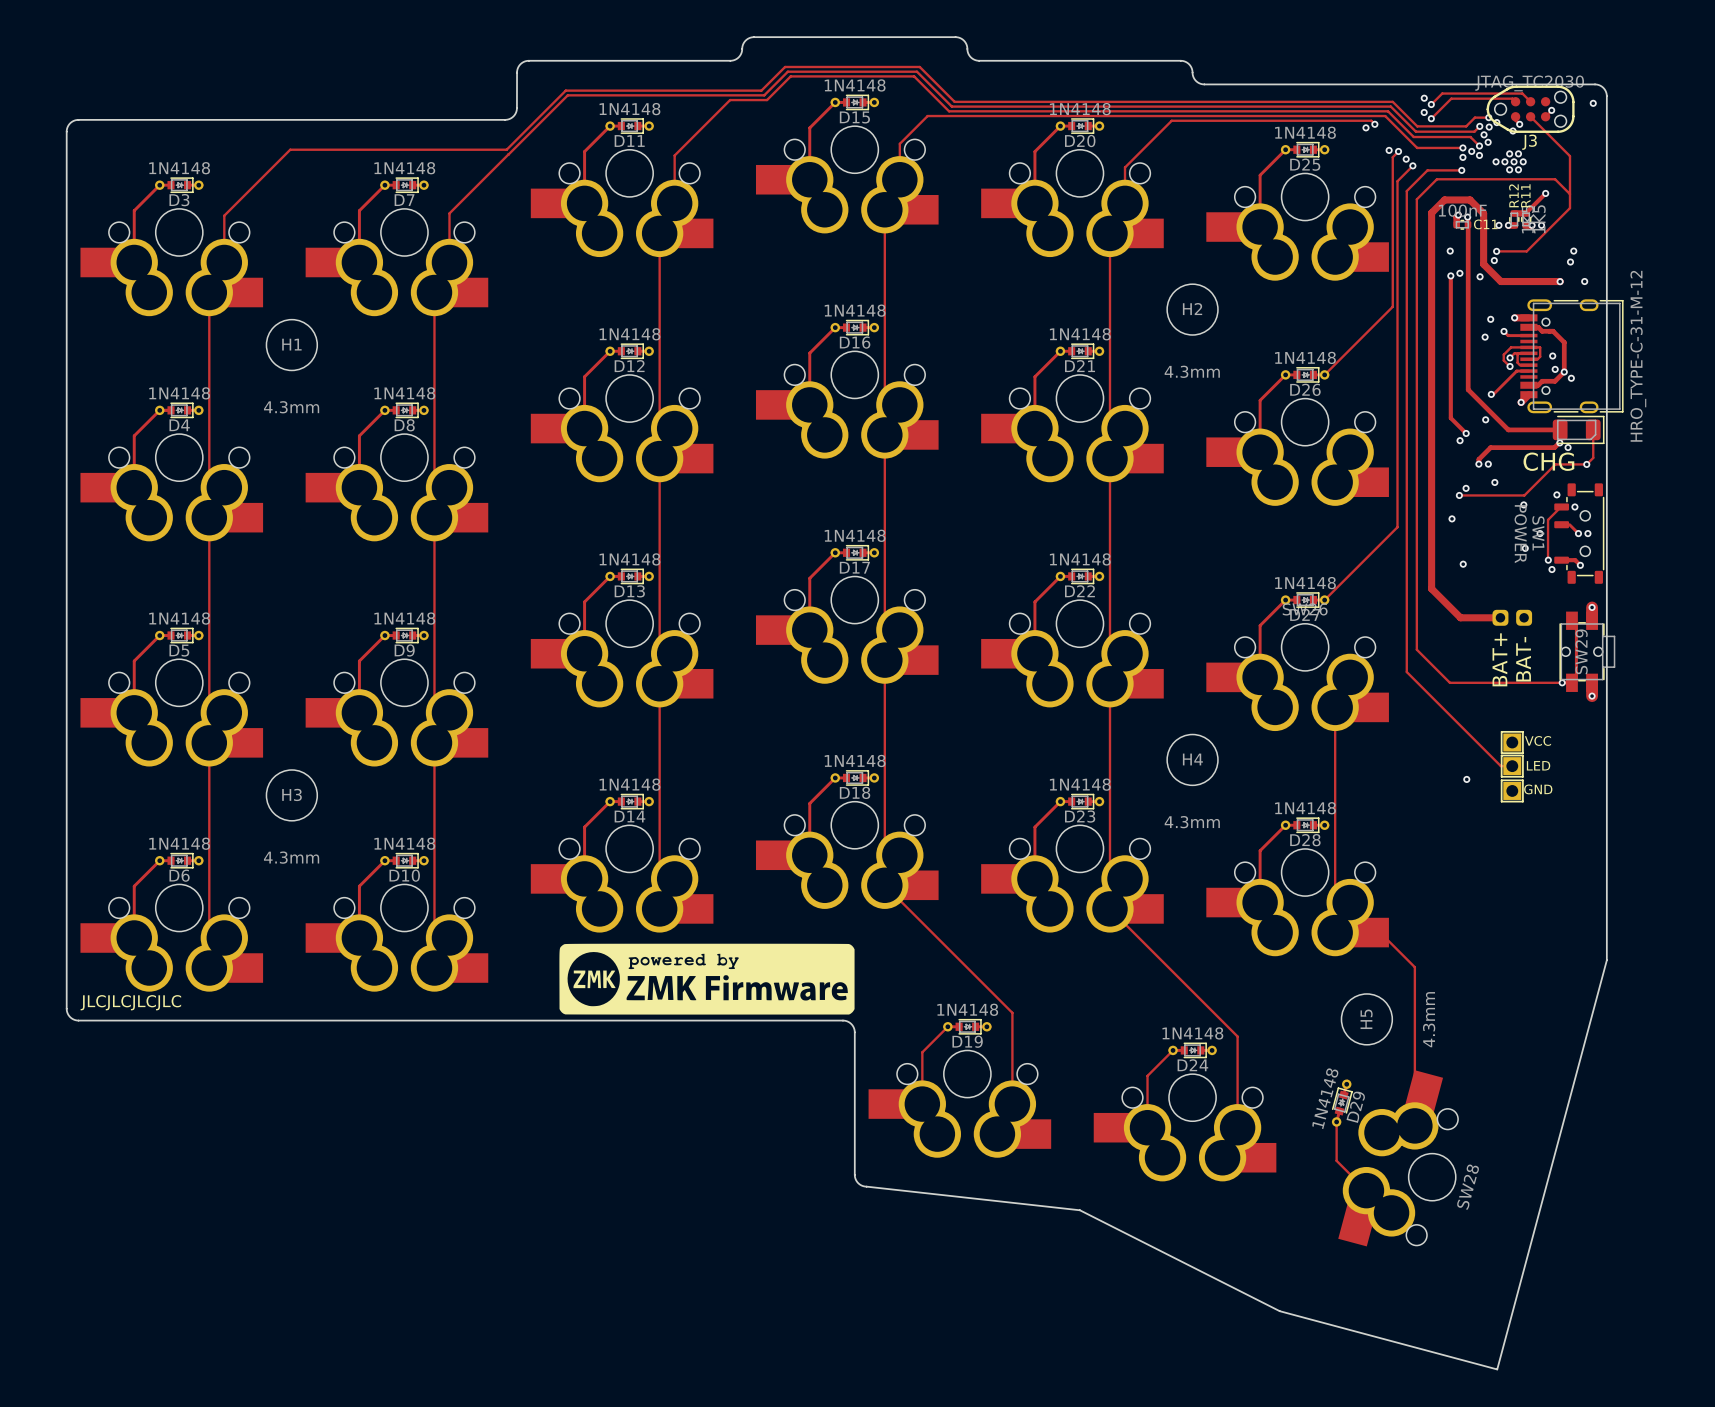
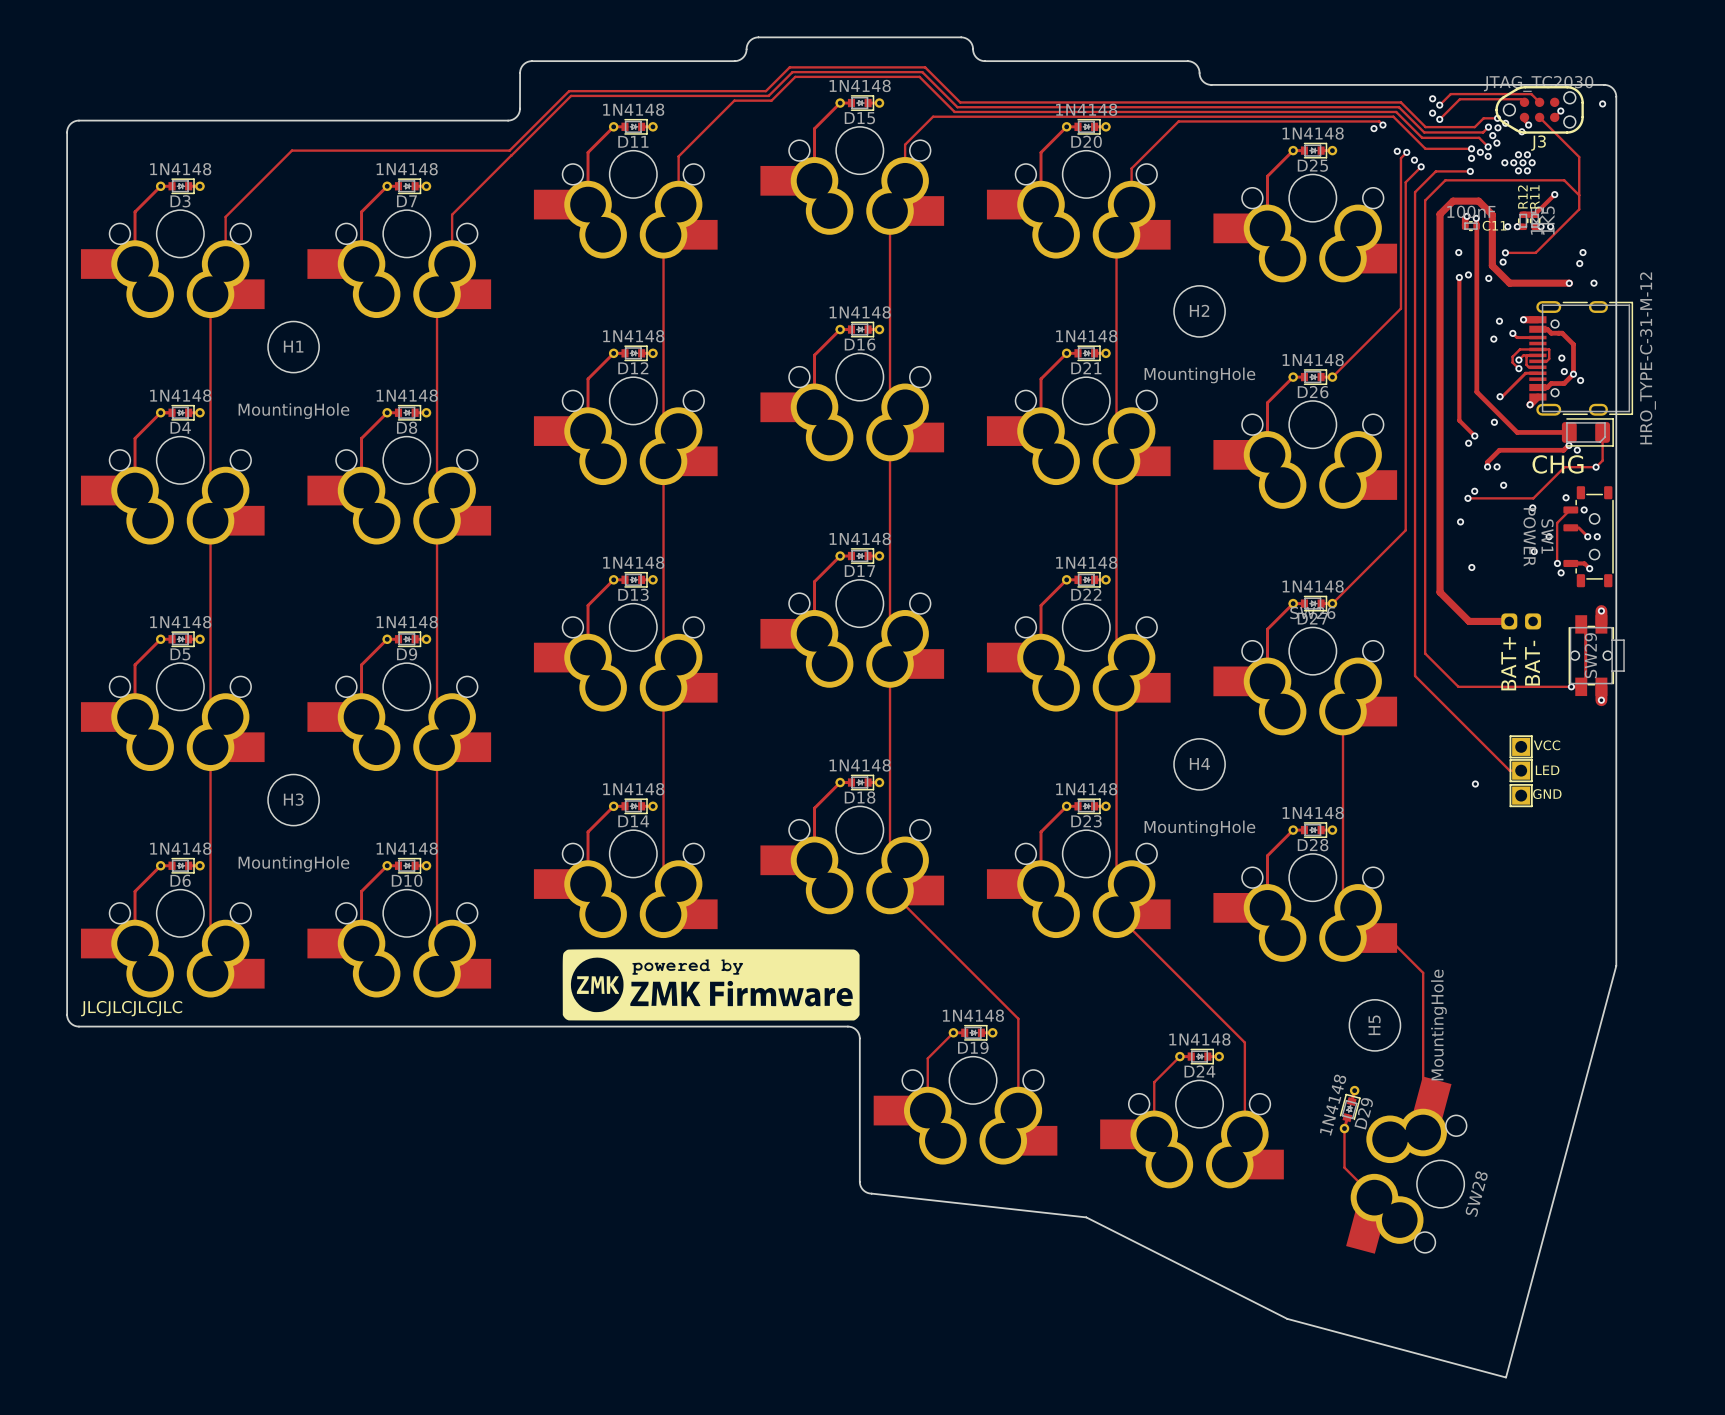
H2 value: 4.3mm (1192, 371) -> MountingHole (1199, 375)
H1 value: 4.3mm (291, 407) -> MountingHole (293, 411)
H4 value: 4.3mm (1192, 822) -> MountingHole (1199, 828)
H3 value: 4.3mm (291, 857) -> MountingHole (293, 864)
H5 value: 4.3mm (1429, 1019) -> MountingHole (1438, 1025)

